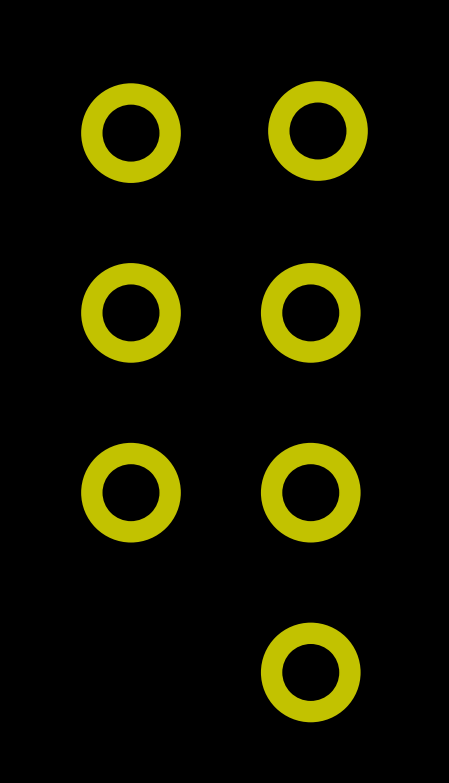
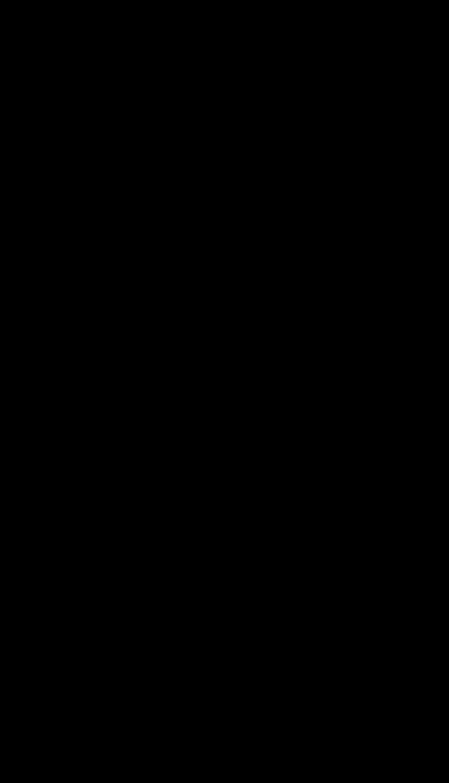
part: (317, 130) -> none
part: (130, 133) -> none
part: (130, 312) -> none
part: (310, 312) -> none
part: (130, 492) -> none
part: (310, 492) -> none
part: (310, 672) -> none

